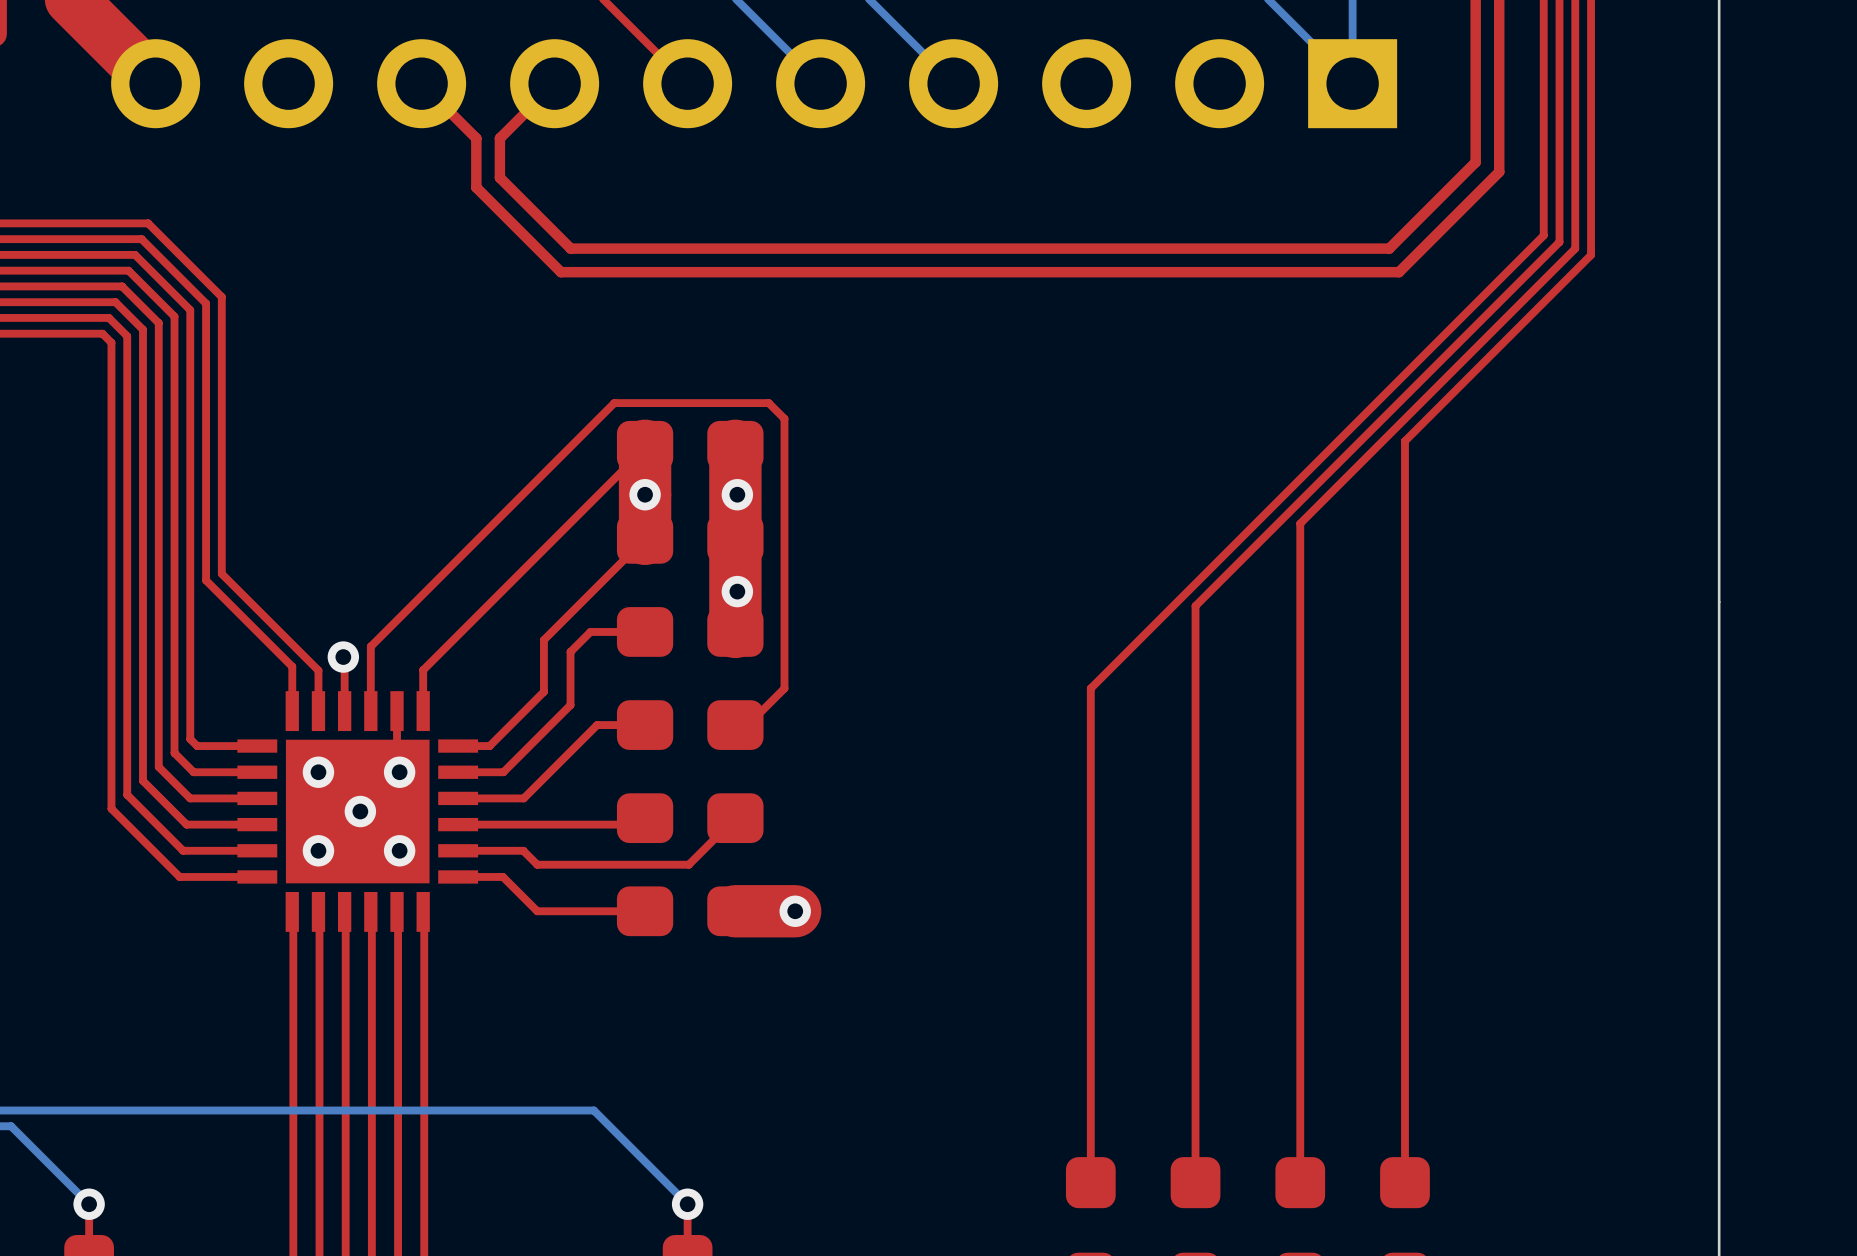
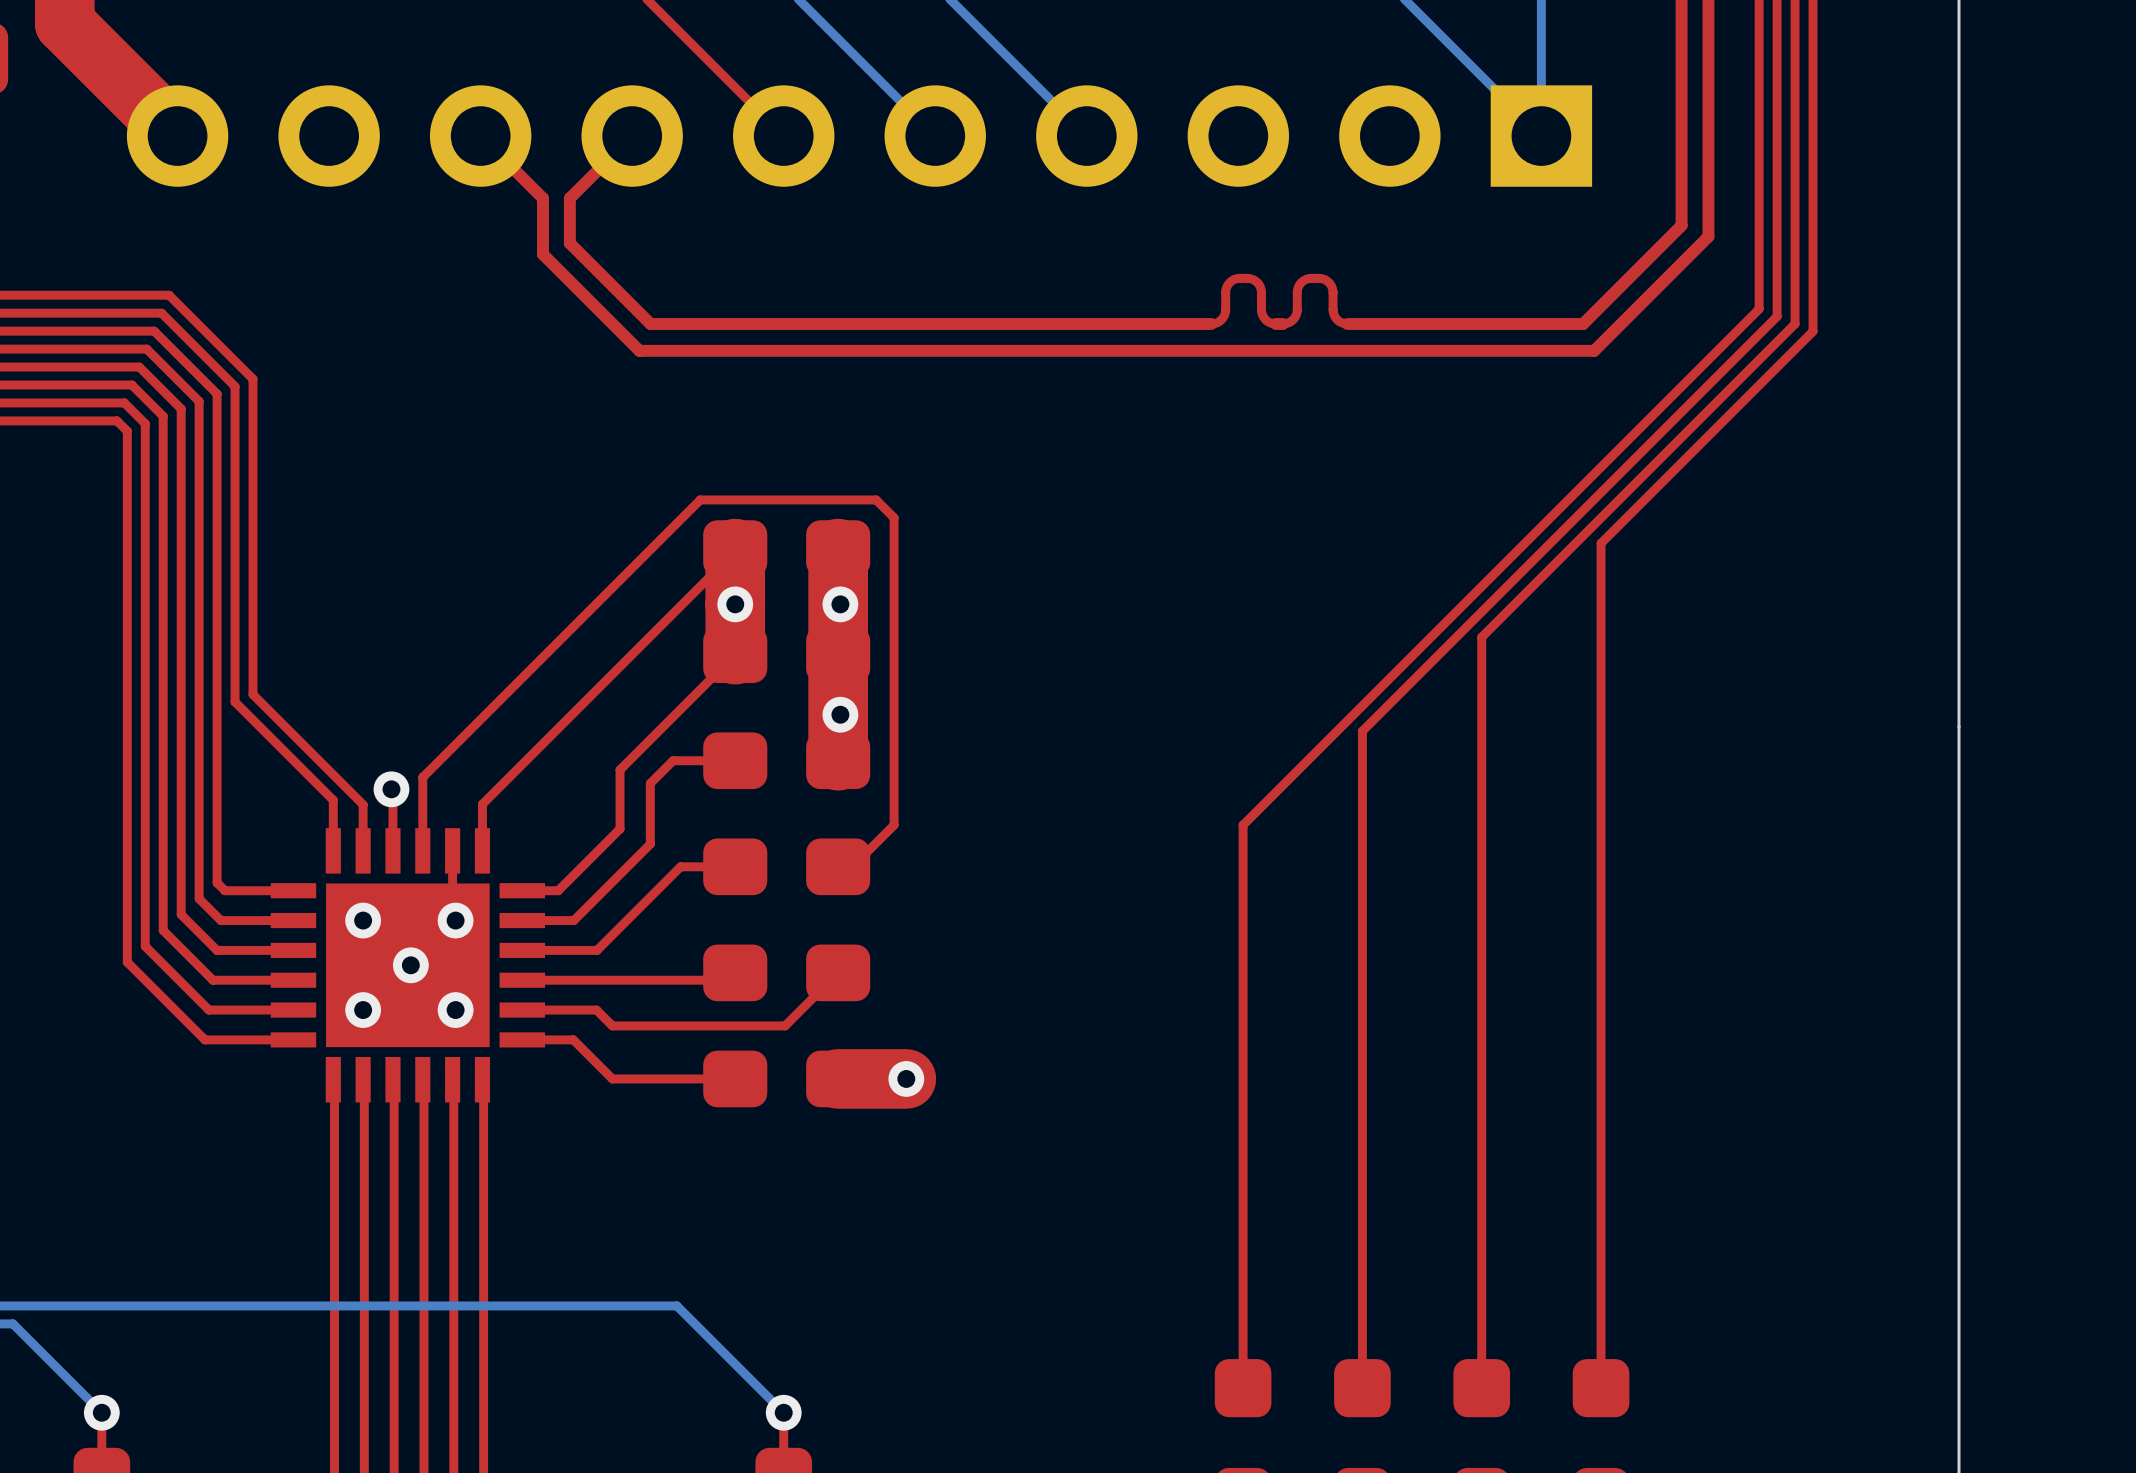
top track: (1119, 248) (1062, 248) -> (1275, 323) (1269, 322) (1263, 317) (1260, 286) (1254, 280) (1247, 278) (1235, 279) (1228, 283) (1225, 291) (1224, 315) (1218, 321) (1211, 323)
top track: (1182, 248) (1125, 248) -> (1347, 323) (1339, 321) (1334, 315) (1330, 285) (1324, 279) (1318, 278) (1306, 279) (1300, 283) (1297, 291) (1295, 315) (1290, 321) (1282, 323)

